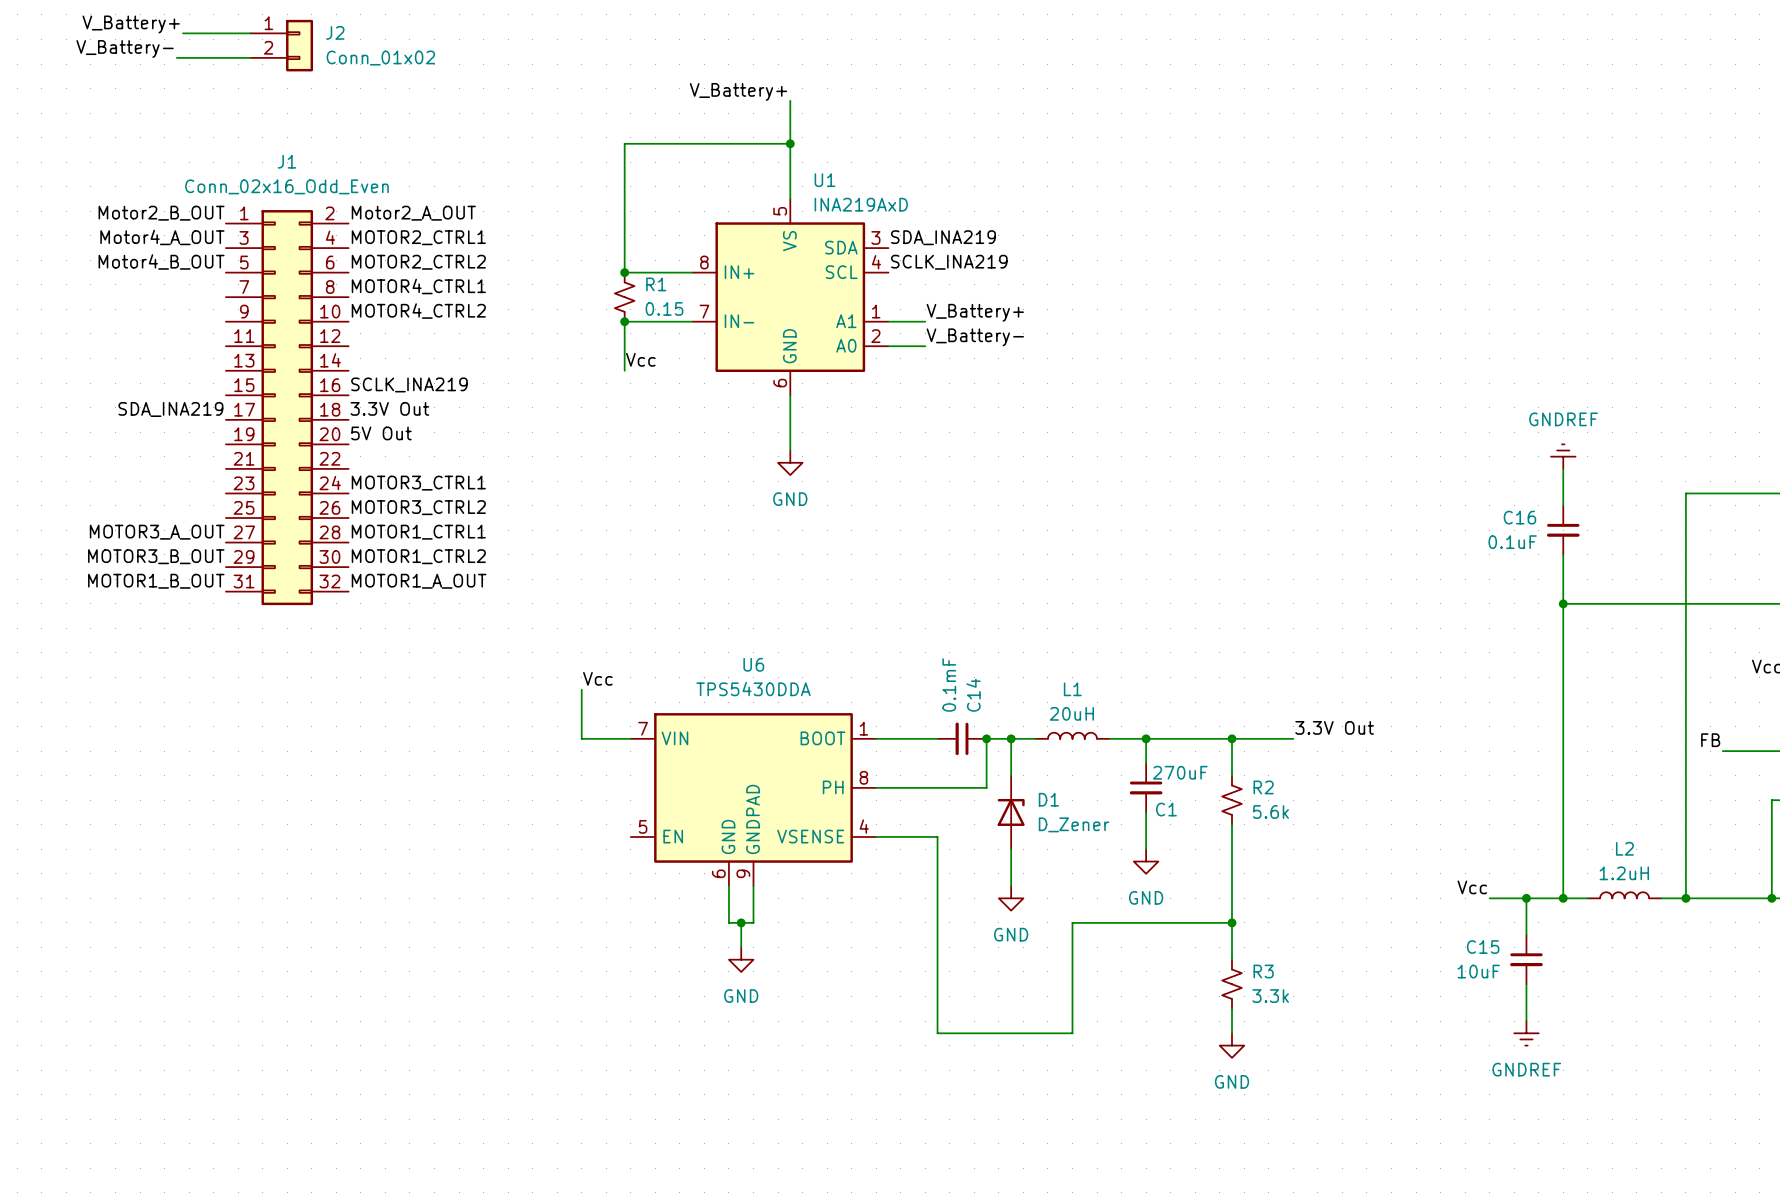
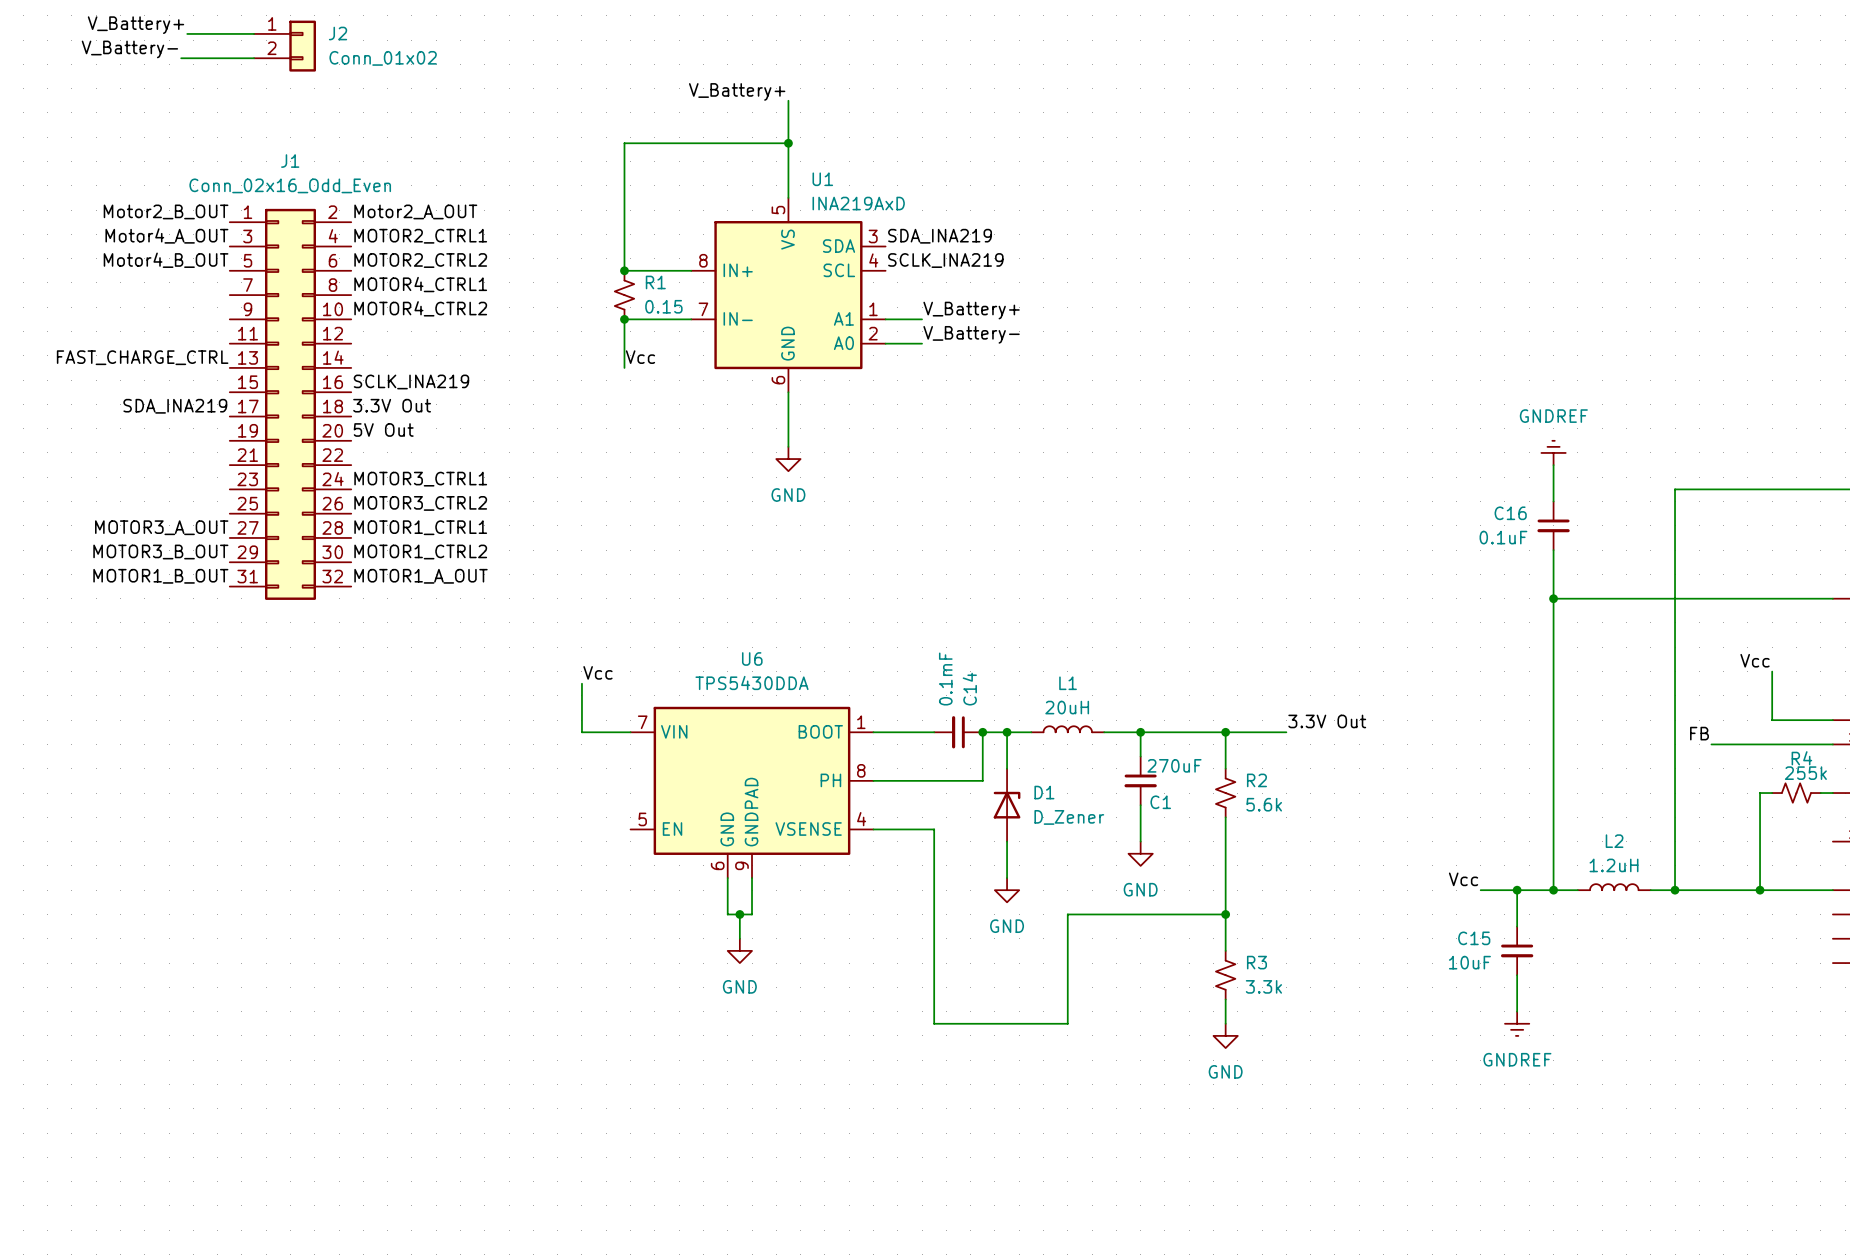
label: none -> FAST_CHARGE_CTRL (142, 357)

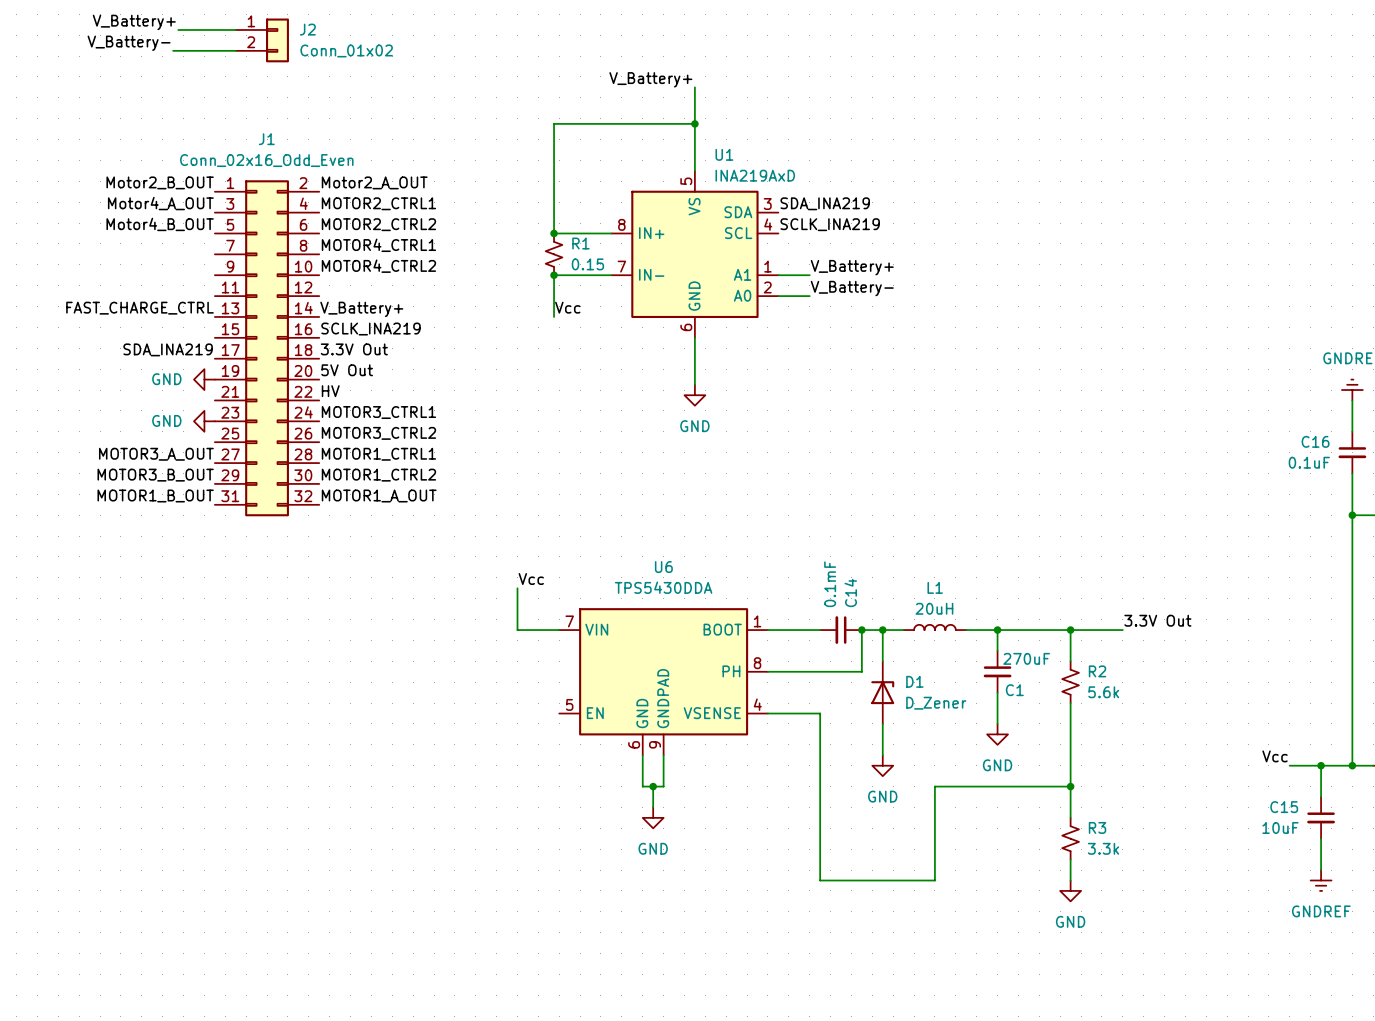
label: none -> V_Battery+ (361, 309)
power symbol: none -> GND (204, 379)
label: none -> HV (330, 391)
power symbol: none -> GND (204, 421)

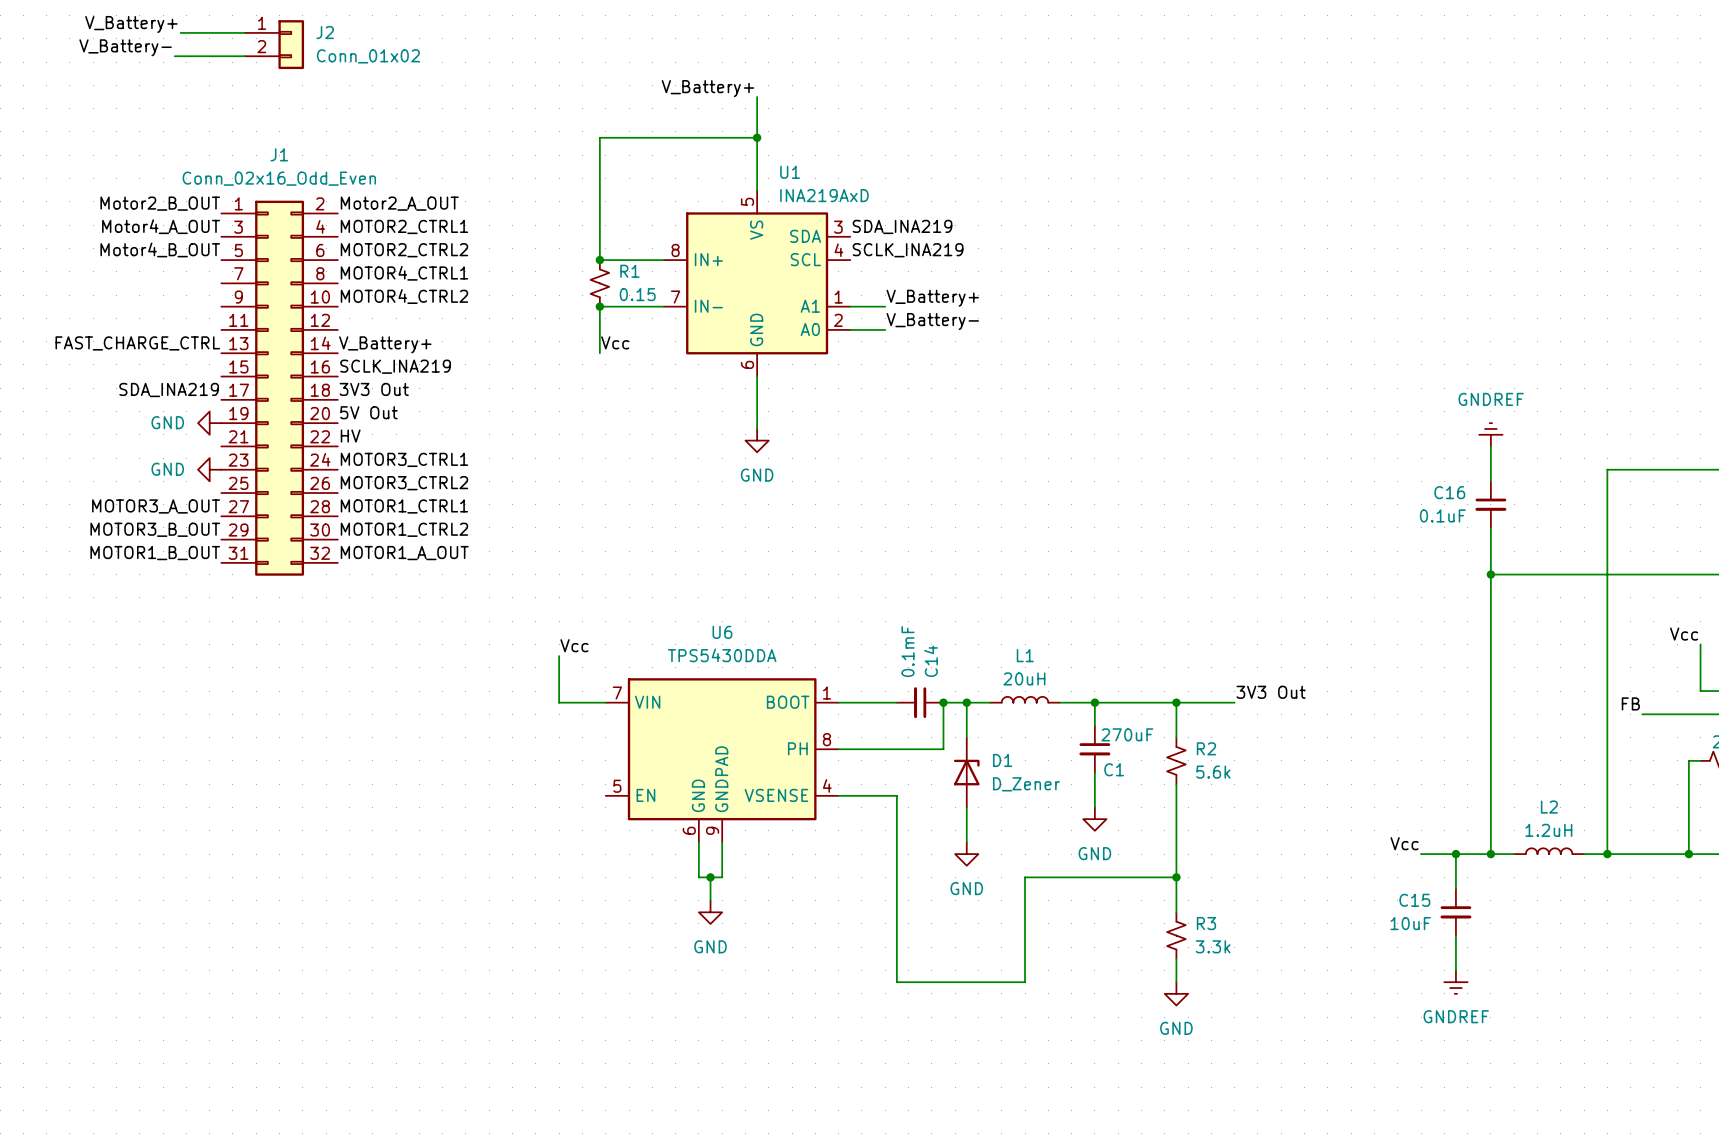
label: 3.3V Out (354, 349) -> 3V3 Out (374, 389)
label: 3.3V Out (1157, 620) -> 3V3 Out (1271, 692)

